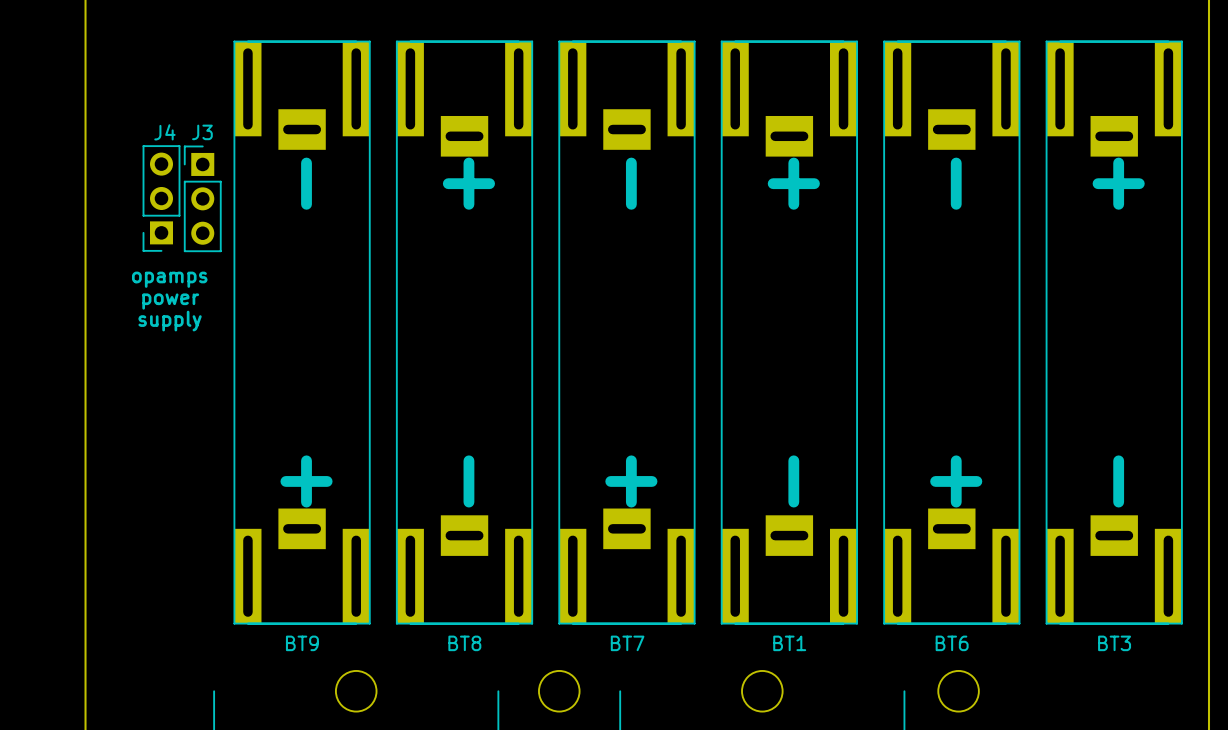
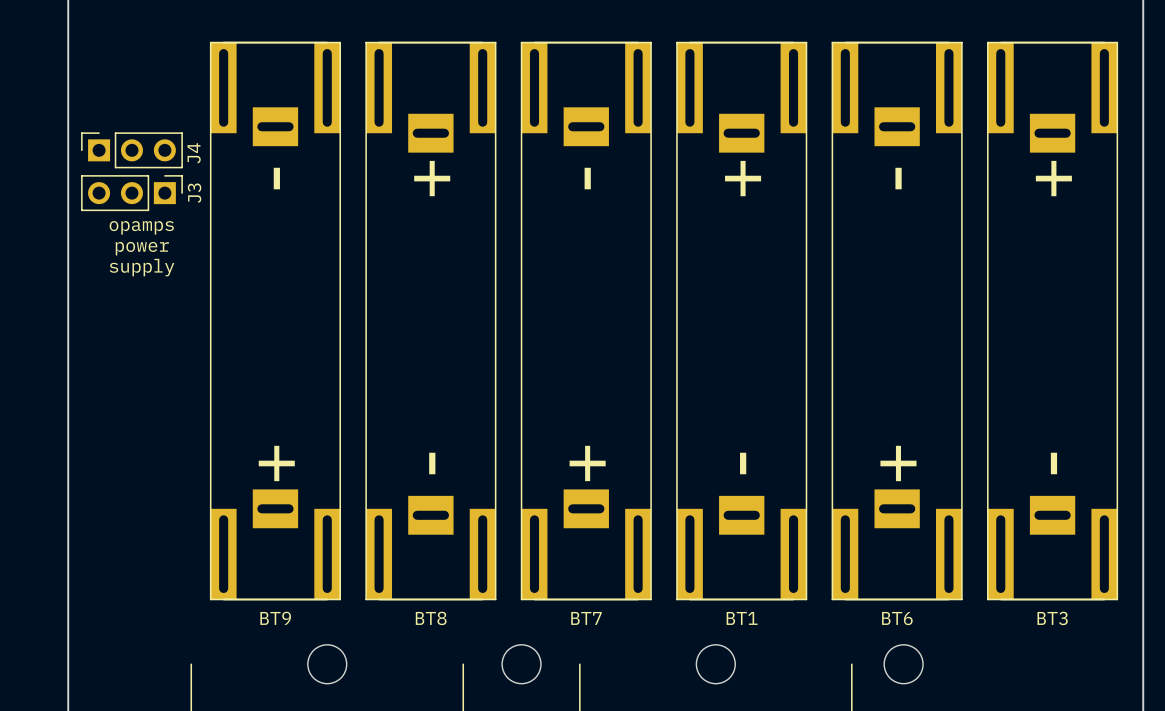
J4 rotation: 0° (161, 198) -> 90° clockwise (131, 150)
J3 rotation: 0° (202, 198) -> 90° clockwise (131, 193)
text: none -> opamps (141, 227)
text: opamps (169, 279) -> supply (141, 267)
text position: power (170, 301) -> power (142, 248)
text: supply (170, 321) -> none

